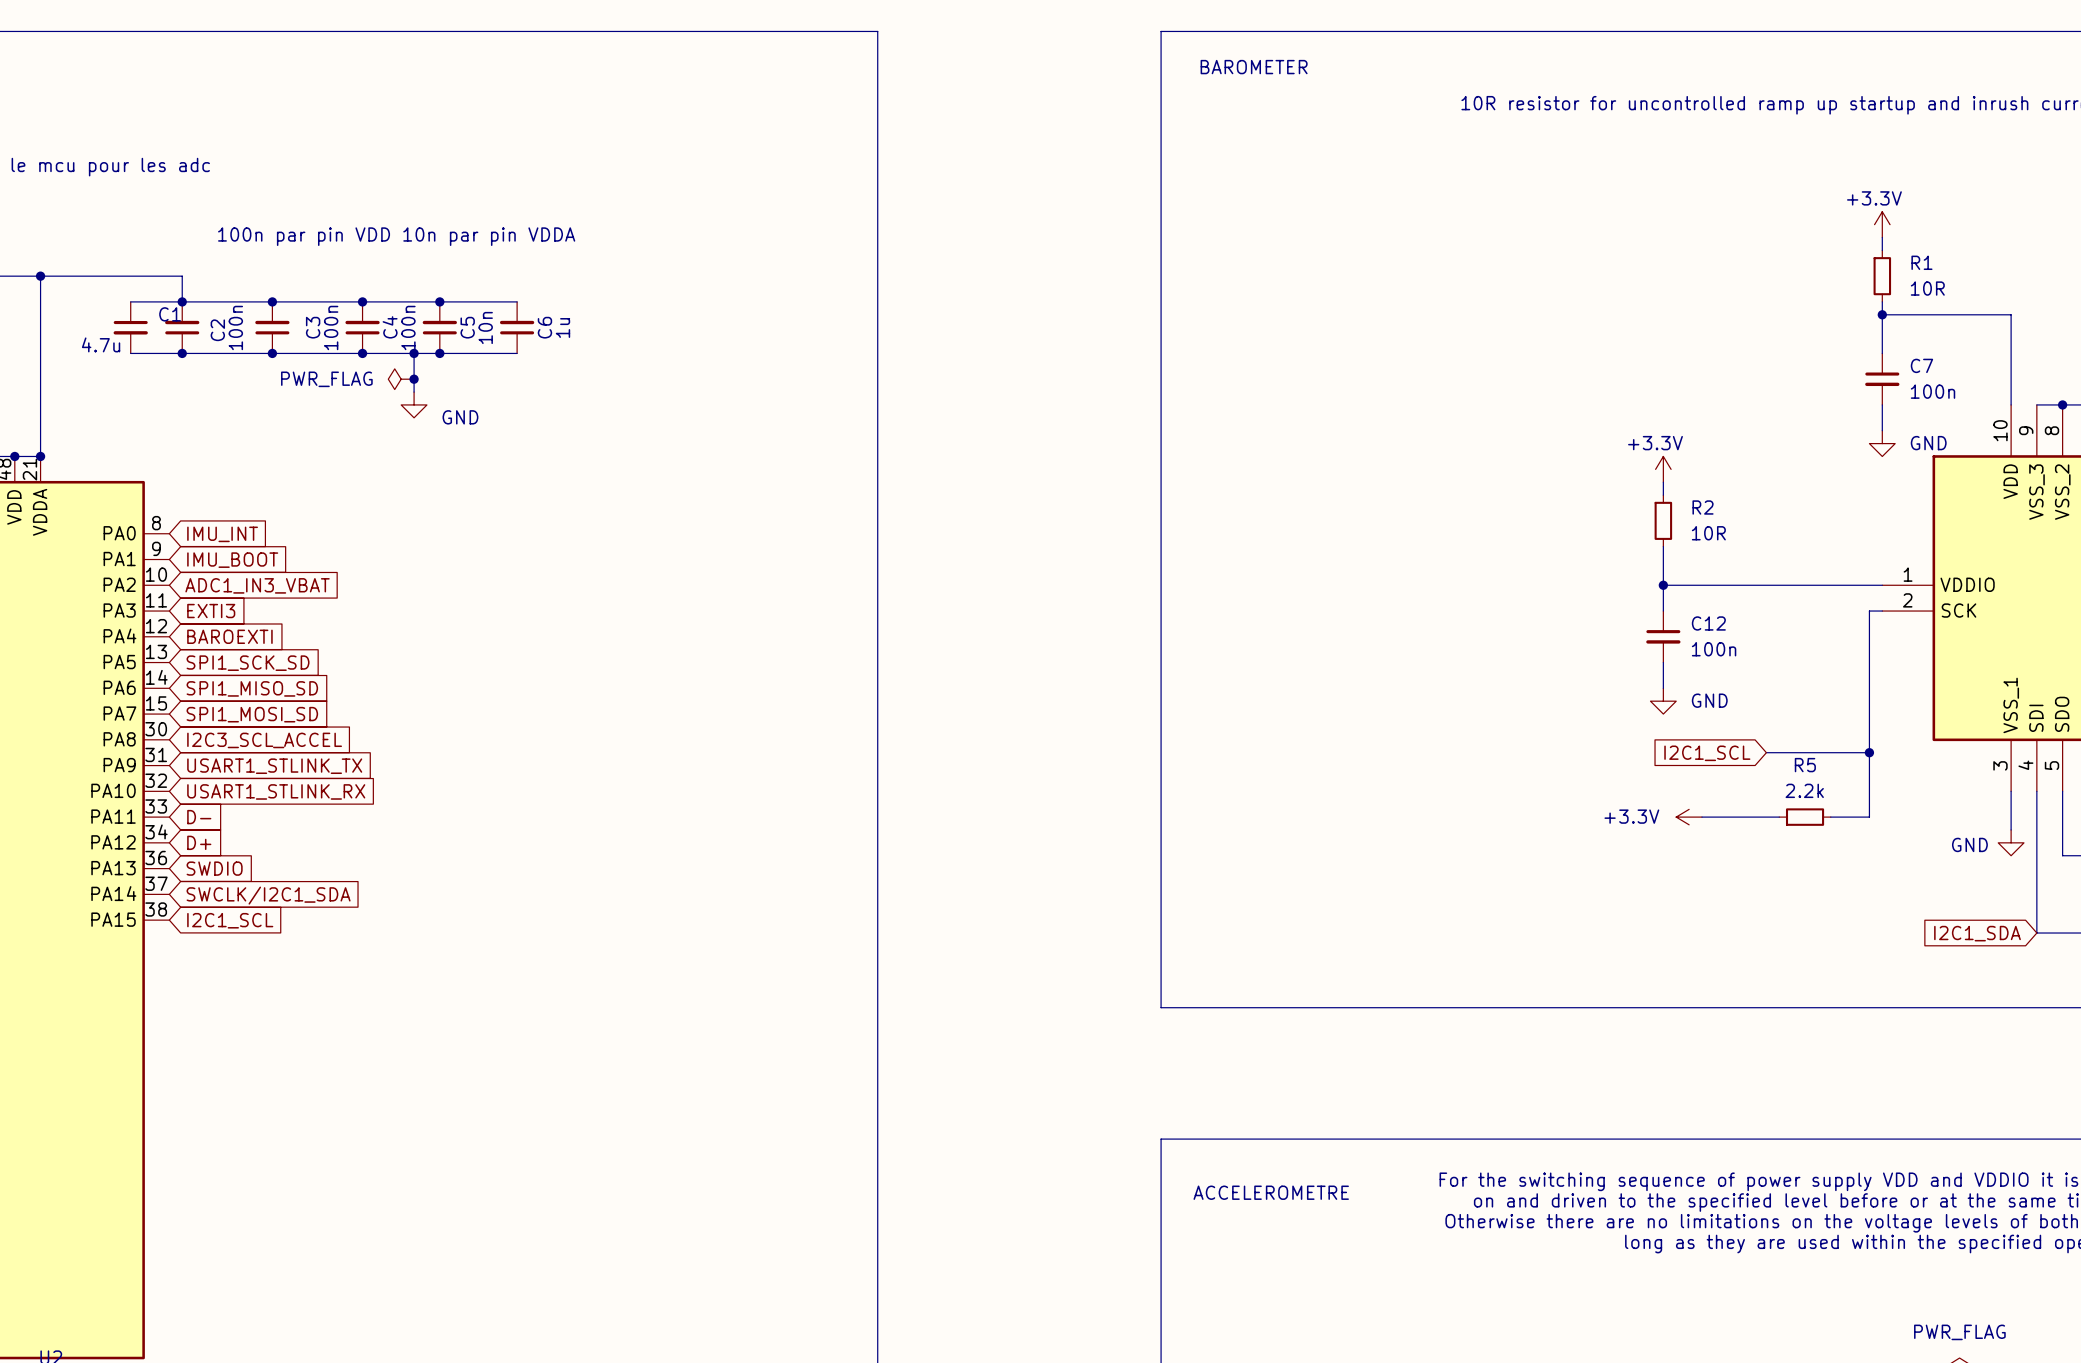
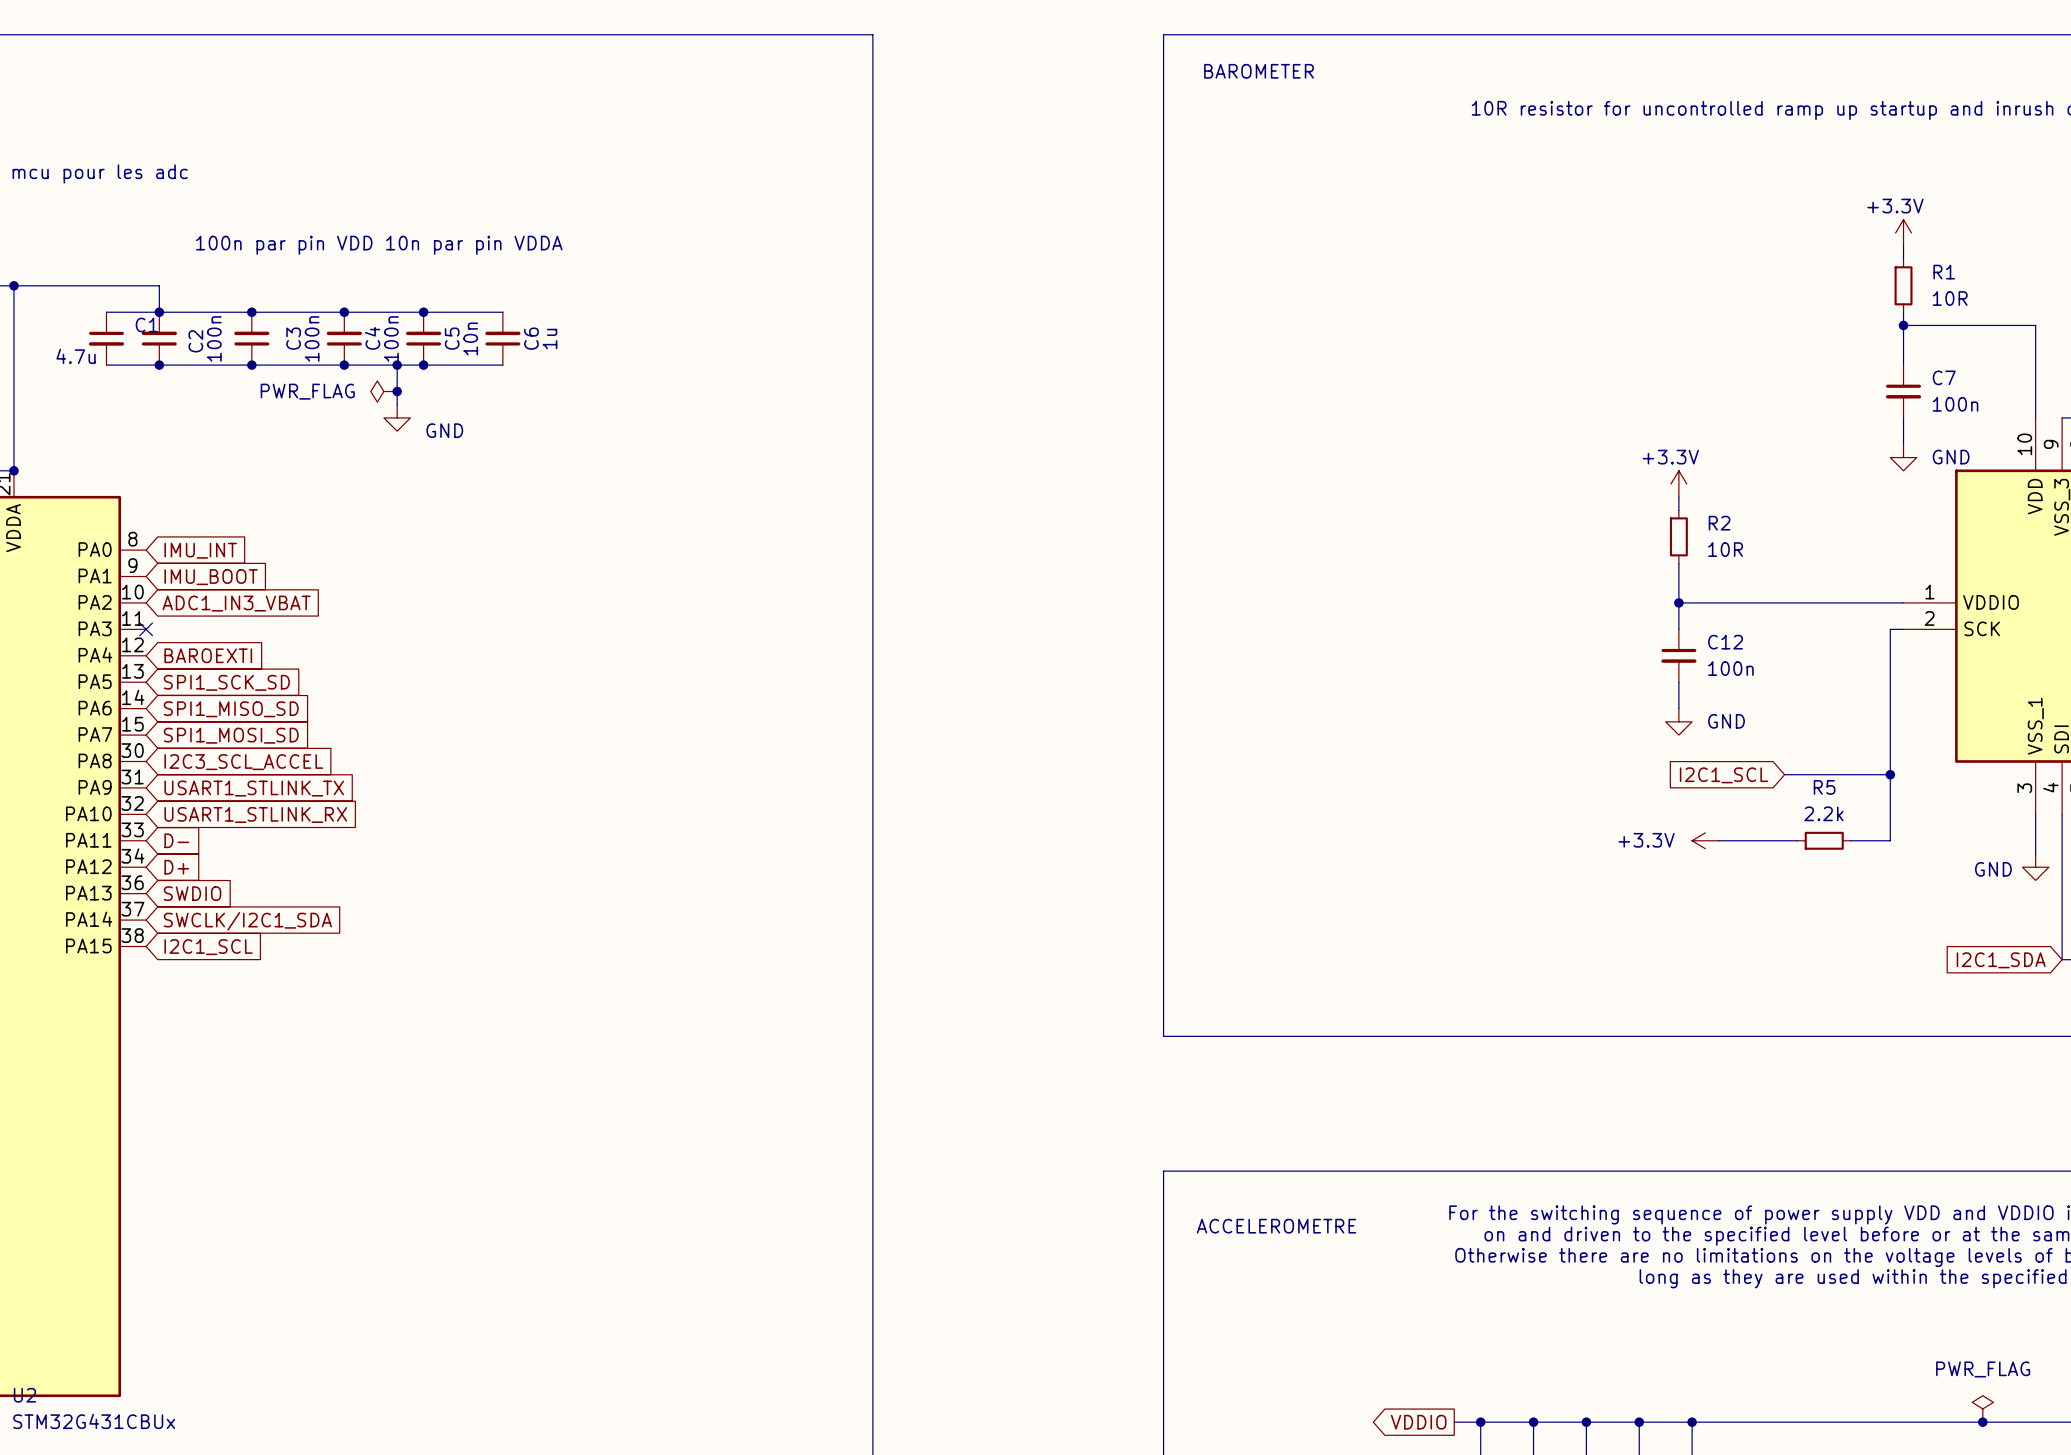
no-connect mark: none -> (146, 629)
global label: EXTI3 (211, 611) -> none

